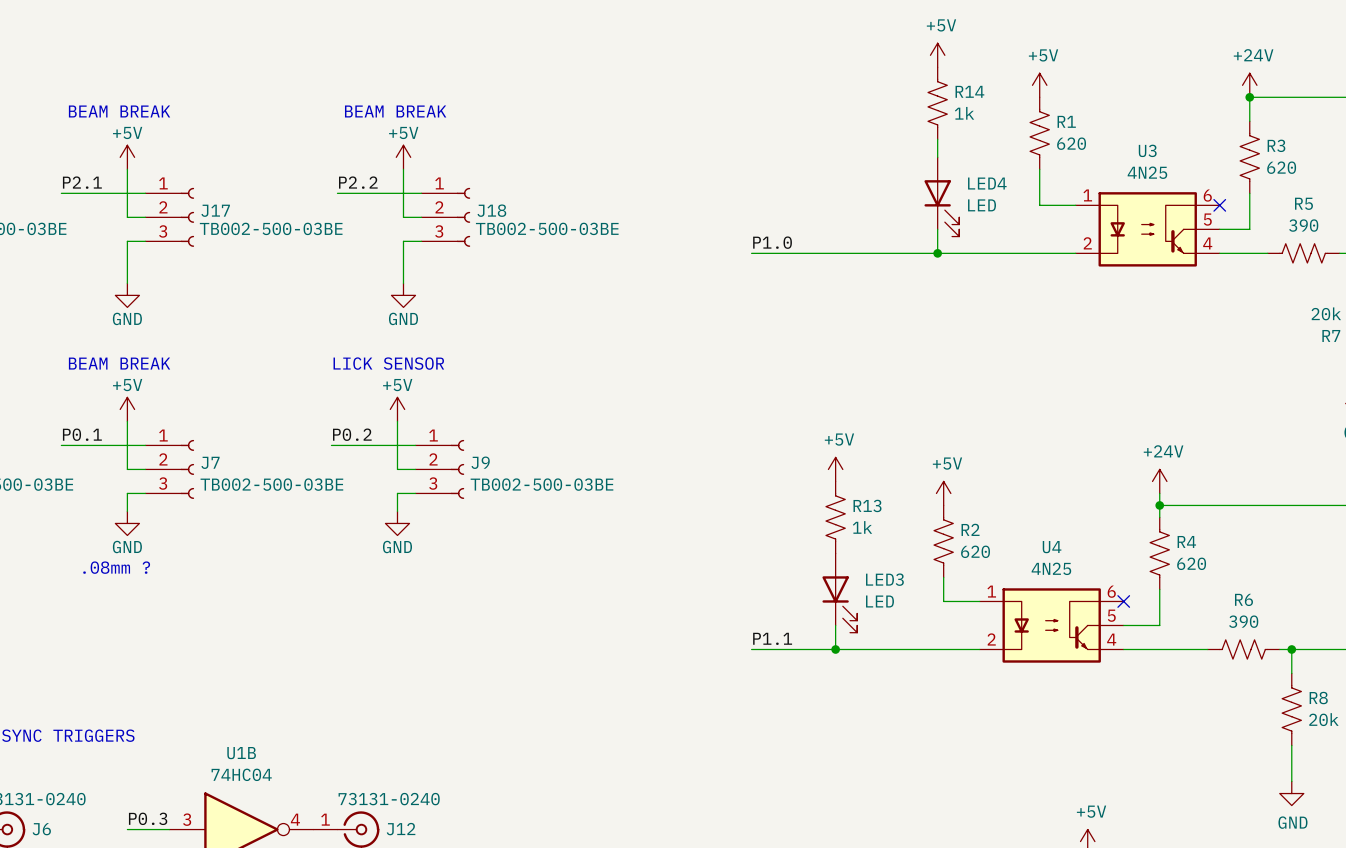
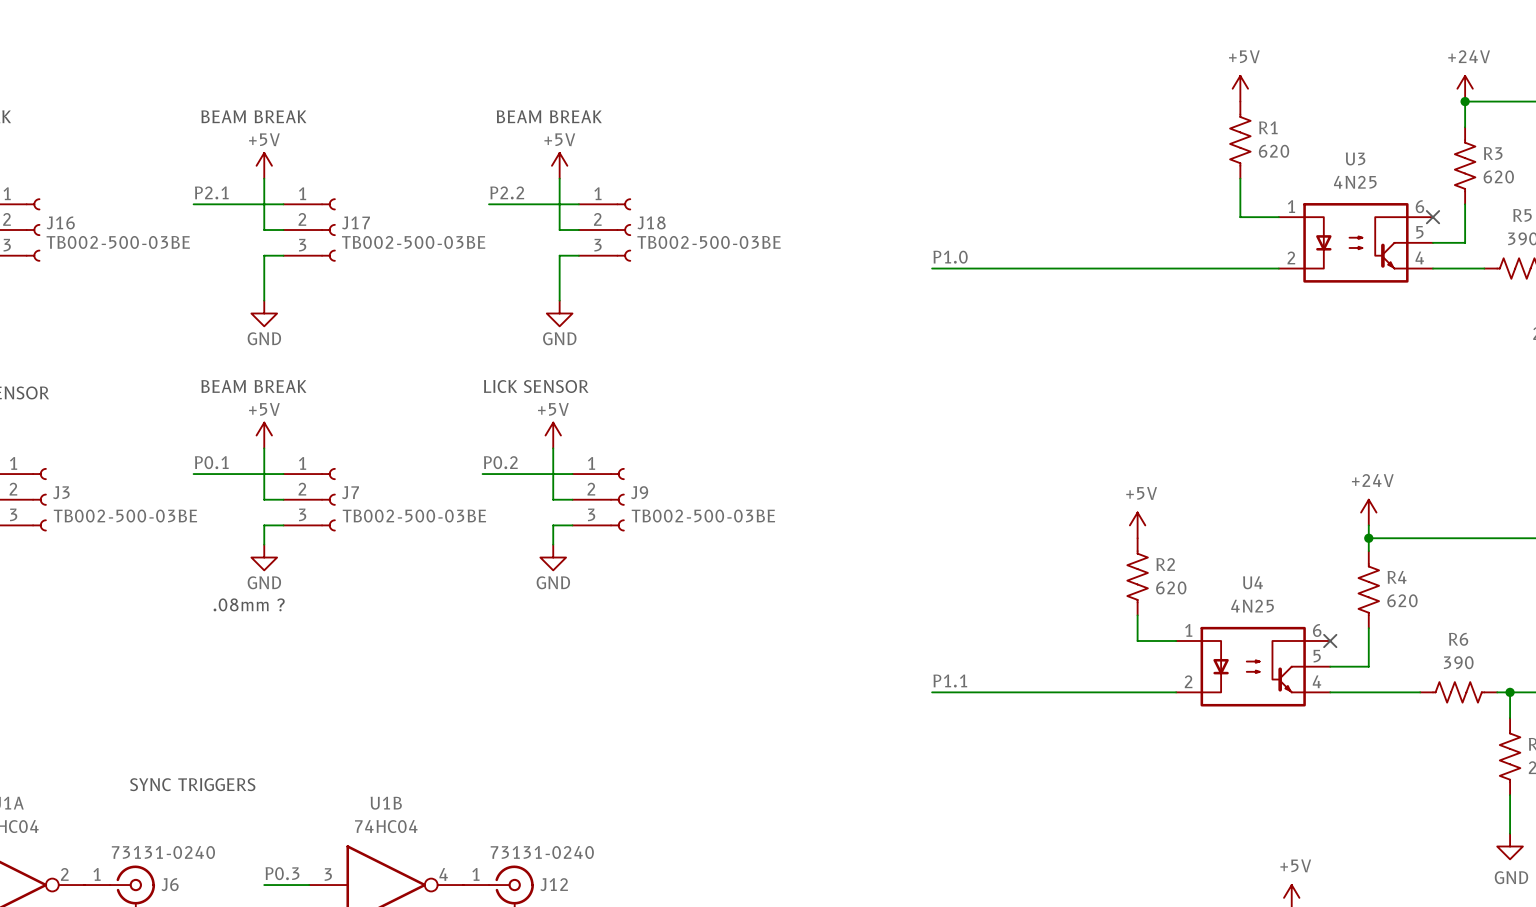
power symbol: +5V (937, 55) -> none
R14: 1k (937, 103) -> none
wire: (937, 139) (937, 157) -> none
LED4: LED (941, 196) -> none
wire: (937, 229) (937, 253) -> none
junction: (937, 253) -> none
power symbol: +5V (835, 469) -> none
R13: 1k (835, 517) -> none
LED3: LED (839, 593) -> none
wire: (835, 625) (835, 649) -> none
junction: (835, 649) -> none

